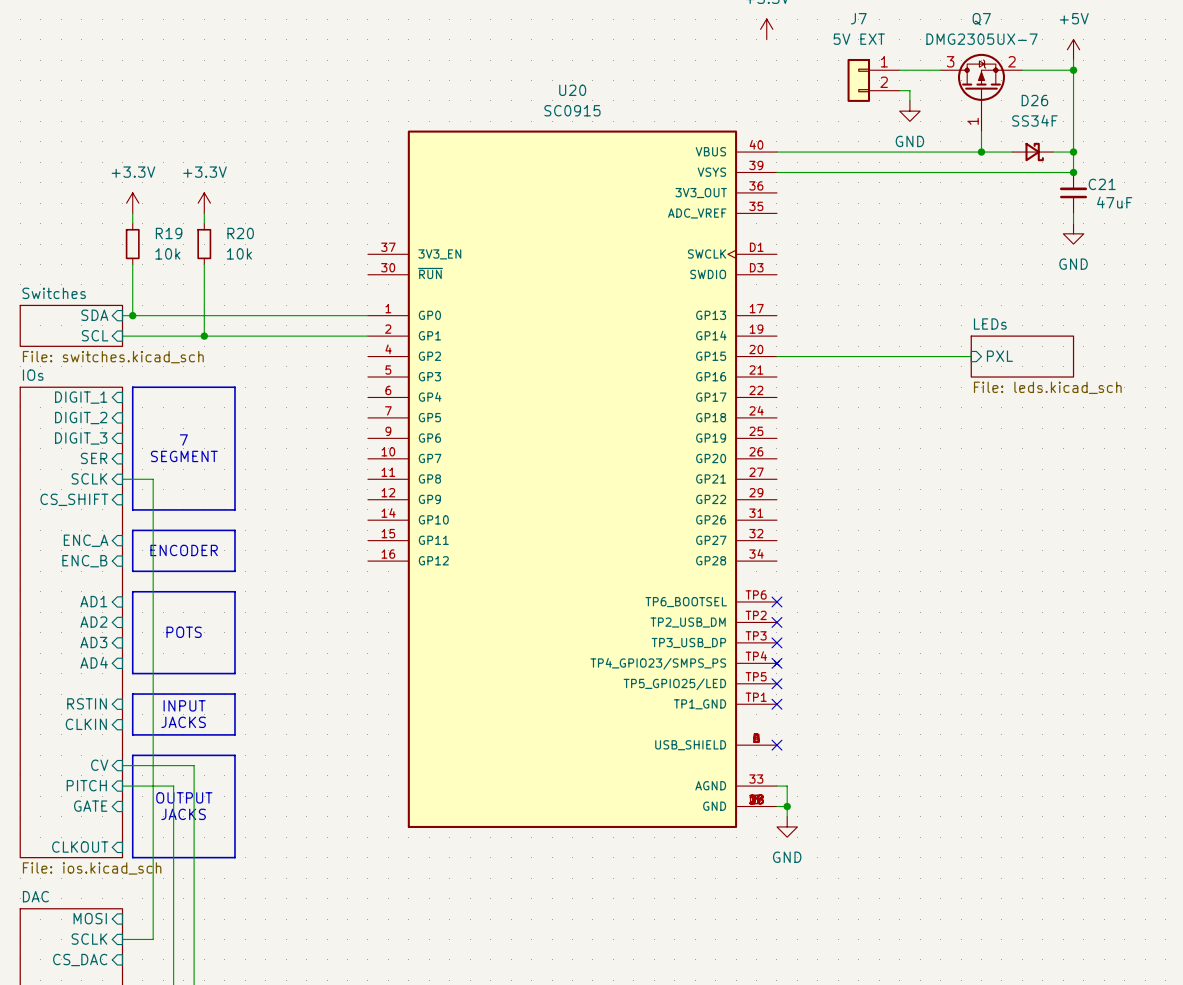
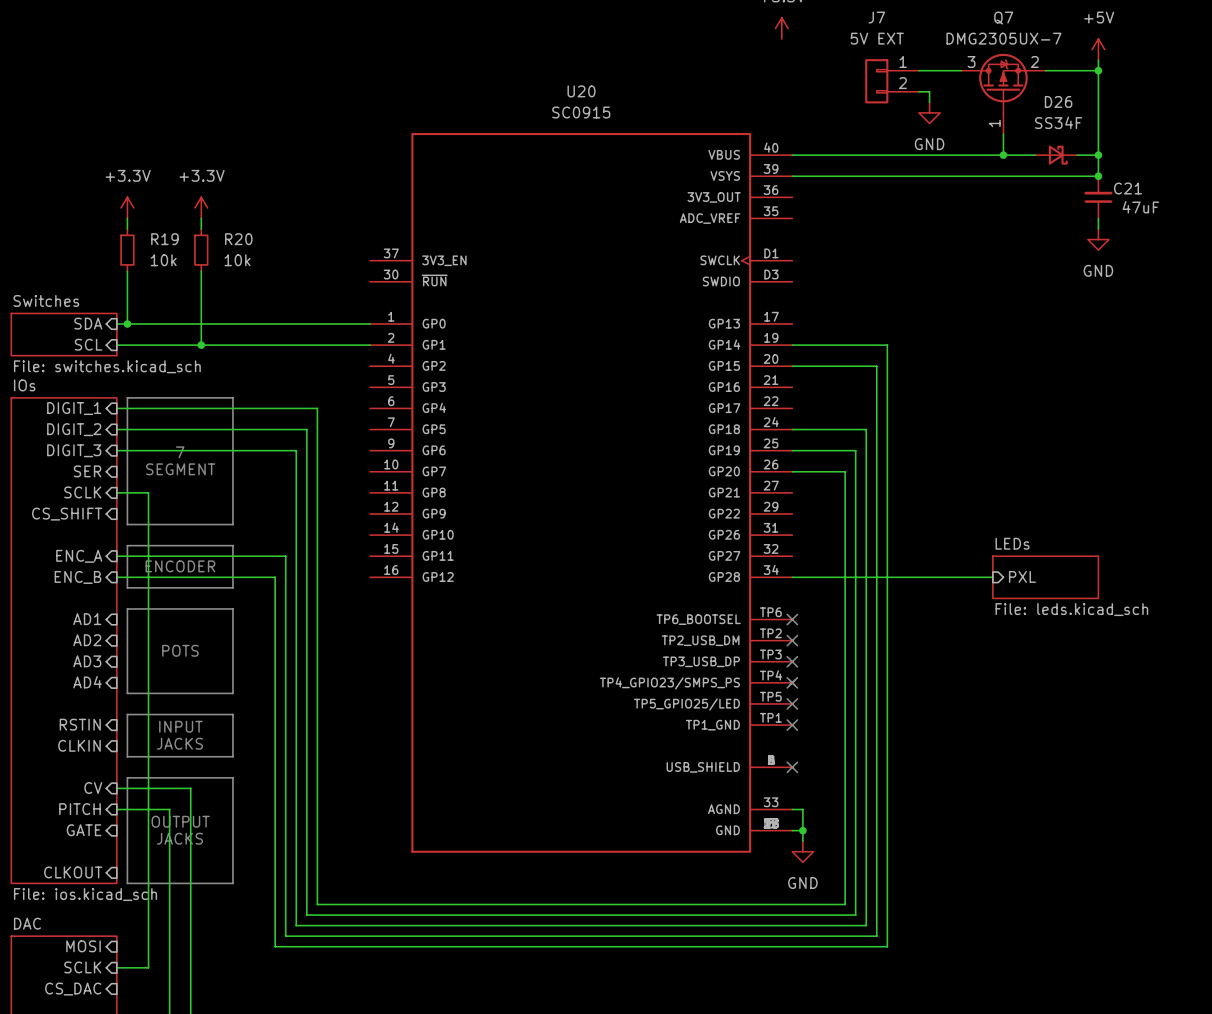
wire: none -> (792, 345) (887, 345) (887, 946) (275, 946) (275, 577) (116, 577)
wire: (858, 356) (971, 356) -> (876, 366) (876, 936) (285, 936) (285, 556) (116, 556)
sheet pin: PXL (999, 356) -> none
sheet LEDs: File: leds.kicad_sch (1022, 356) -> none
wire: none -> (116, 408) (317, 408) (317, 904) (845, 904) (845, 471) (792, 471)
wire: none -> (116, 429) (306, 429) (306, 915) (855, 915) (855, 450) (792, 450)
wire: none -> (792, 429) (866, 429) (866, 925) (296, 925) (296, 450) (116, 450)
sheet pin: none -> PXL (1022, 576)
wire: none -> (792, 577) (992, 577)
sheet LEDs: none -> File: leds.kicad_sch (1045, 577)

